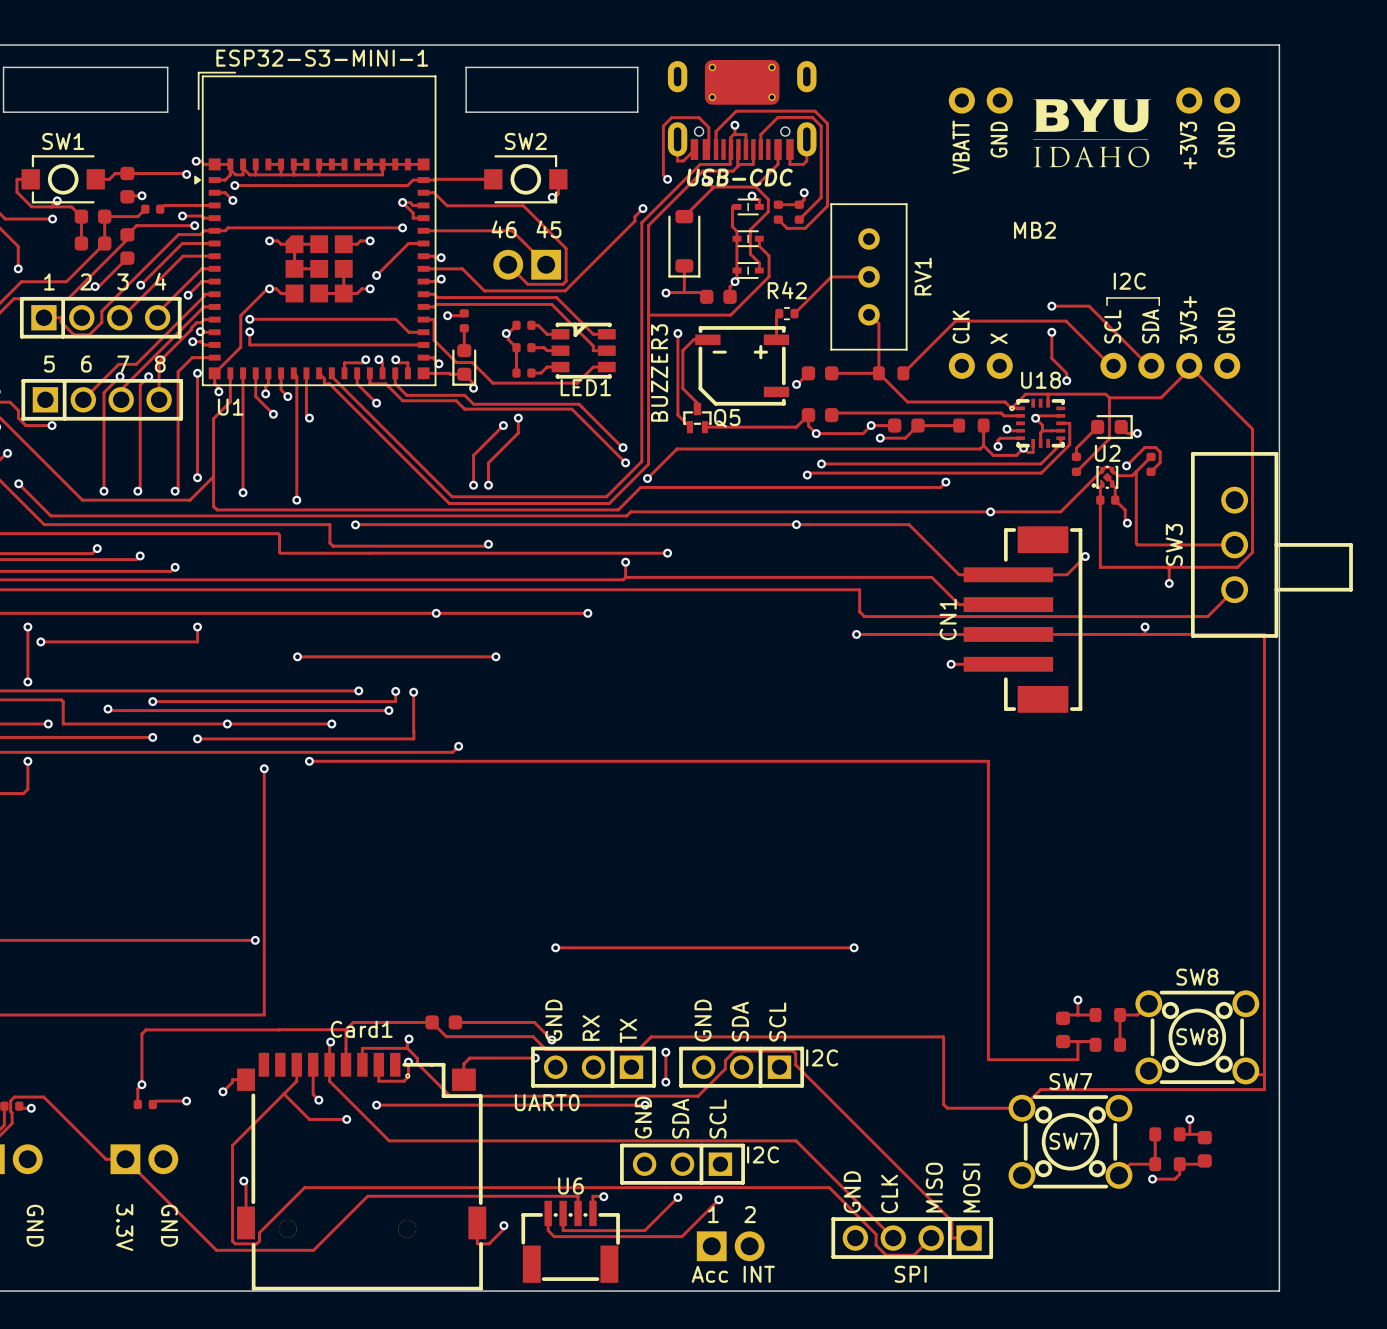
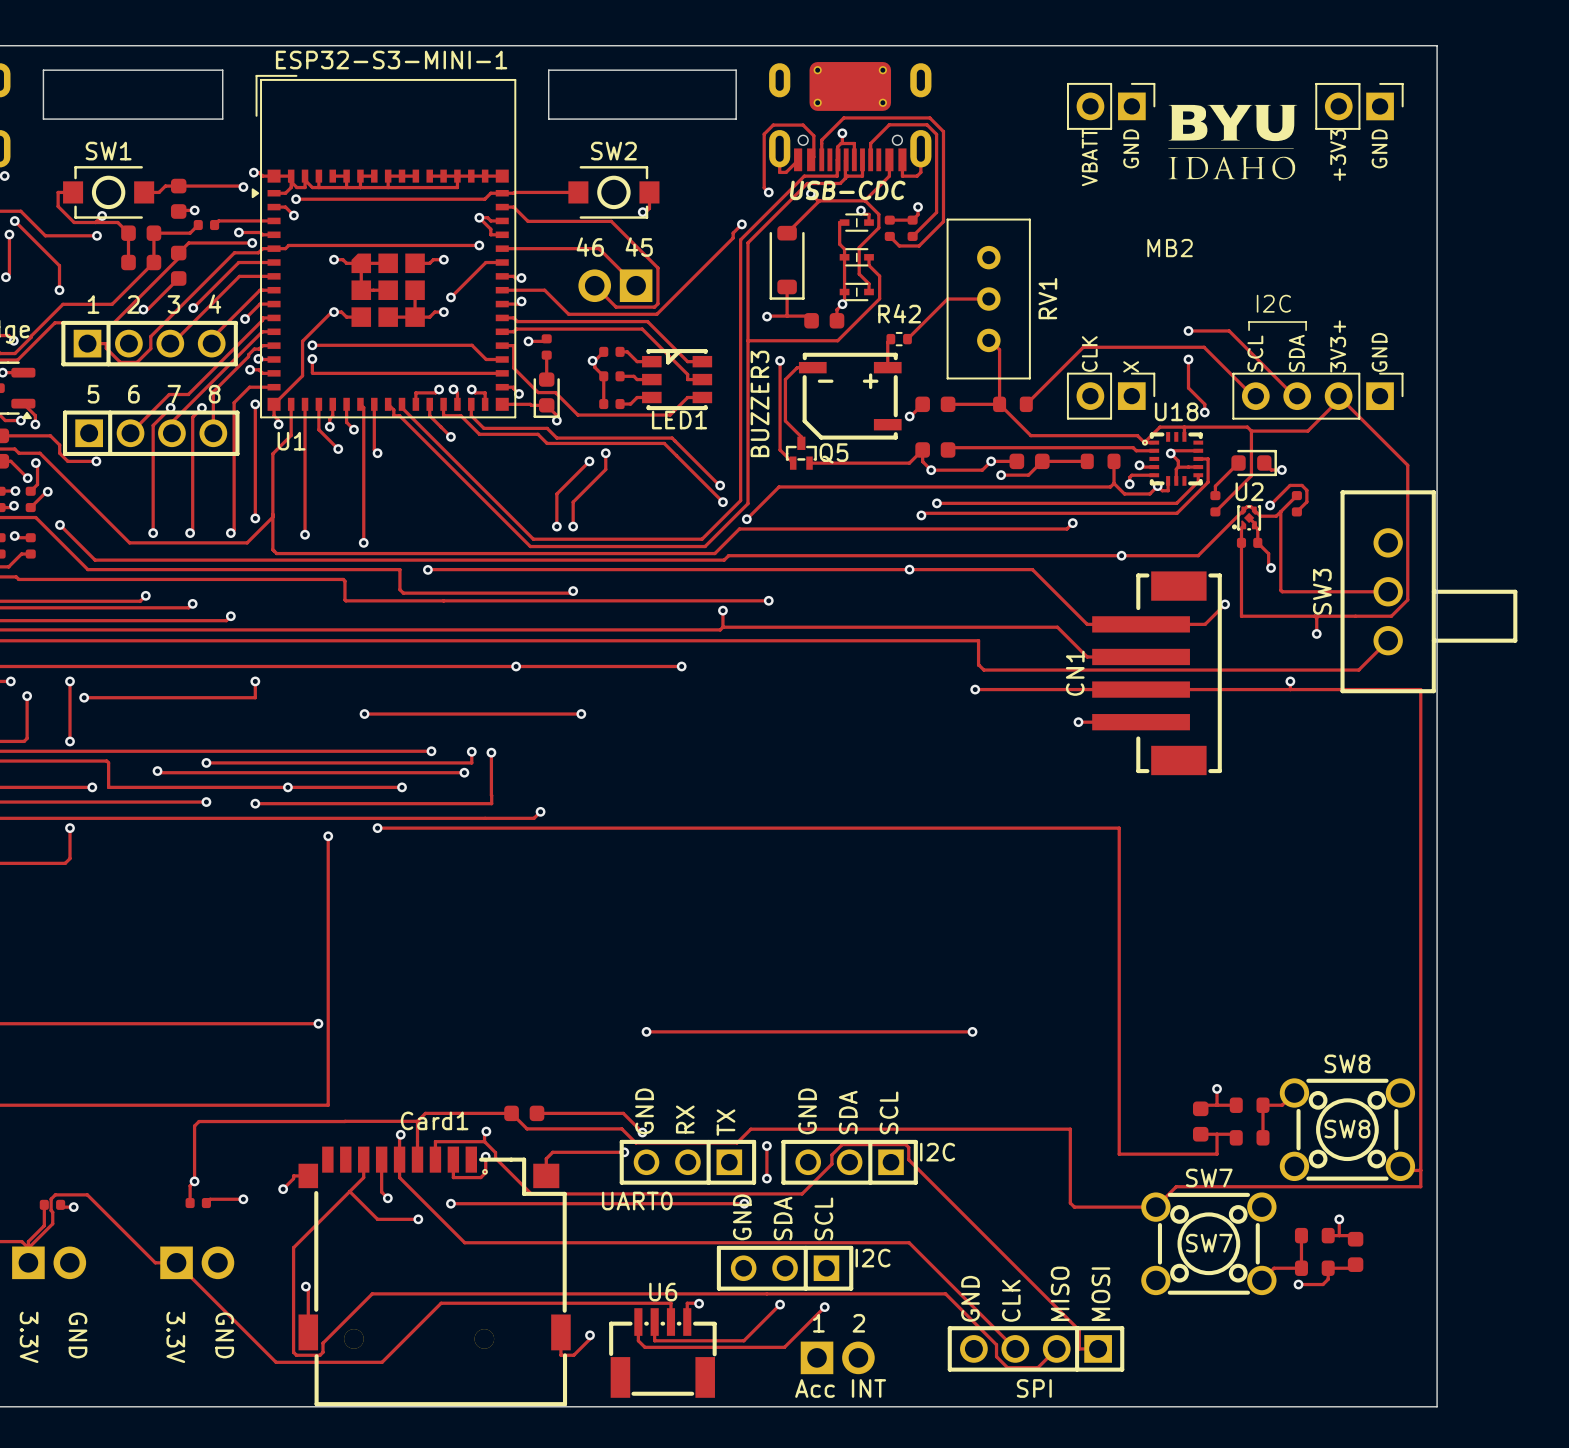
MB2 footprint: [948, 87, 1241, 379] -> [1066, 82, 1404, 420]

